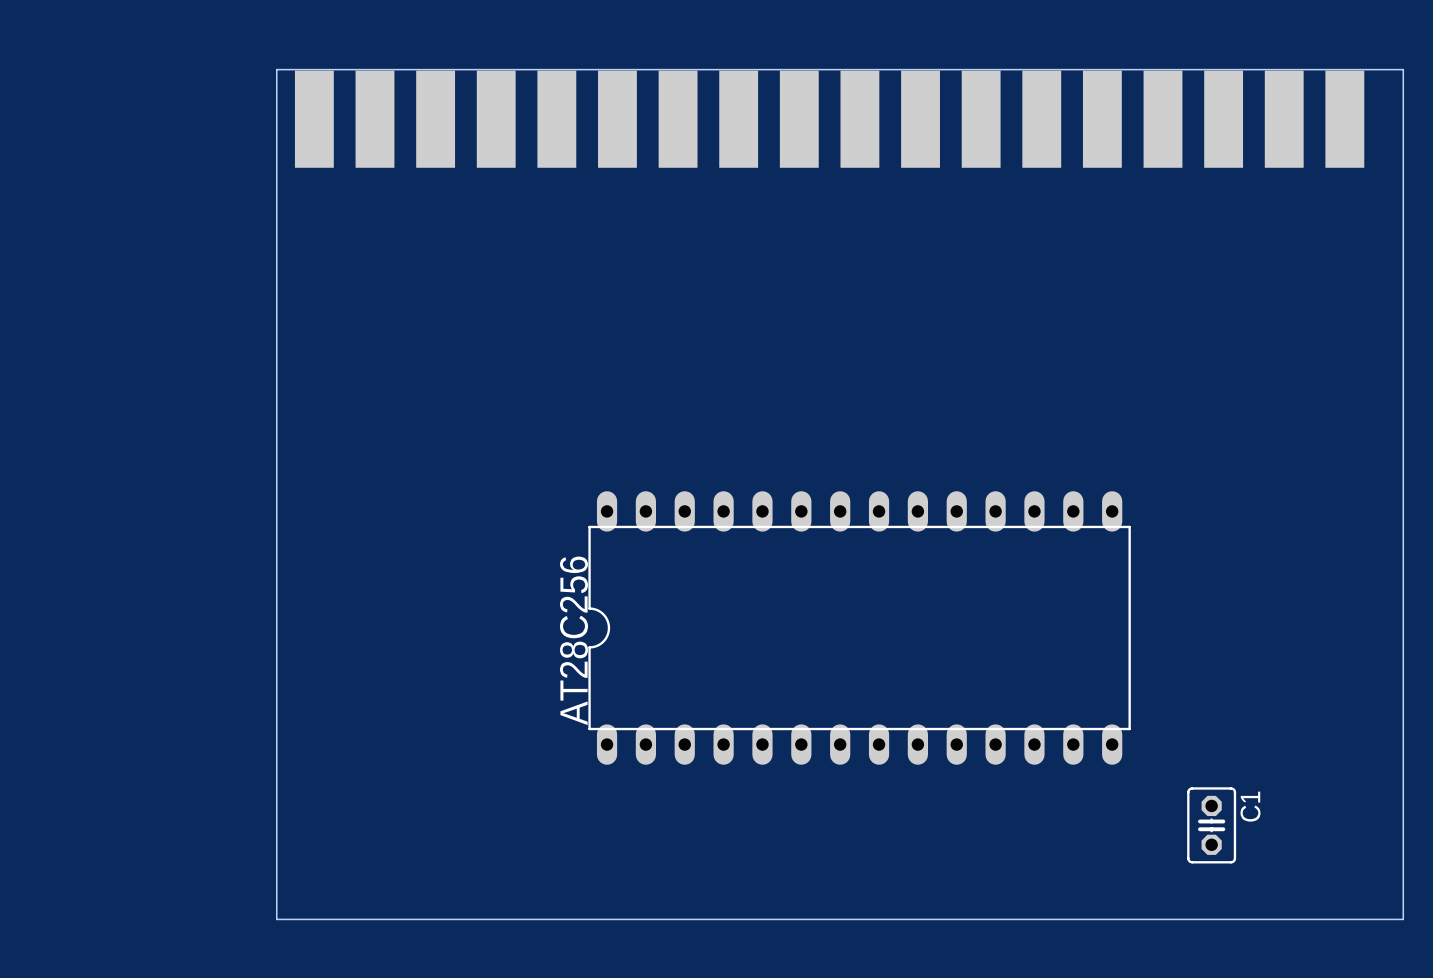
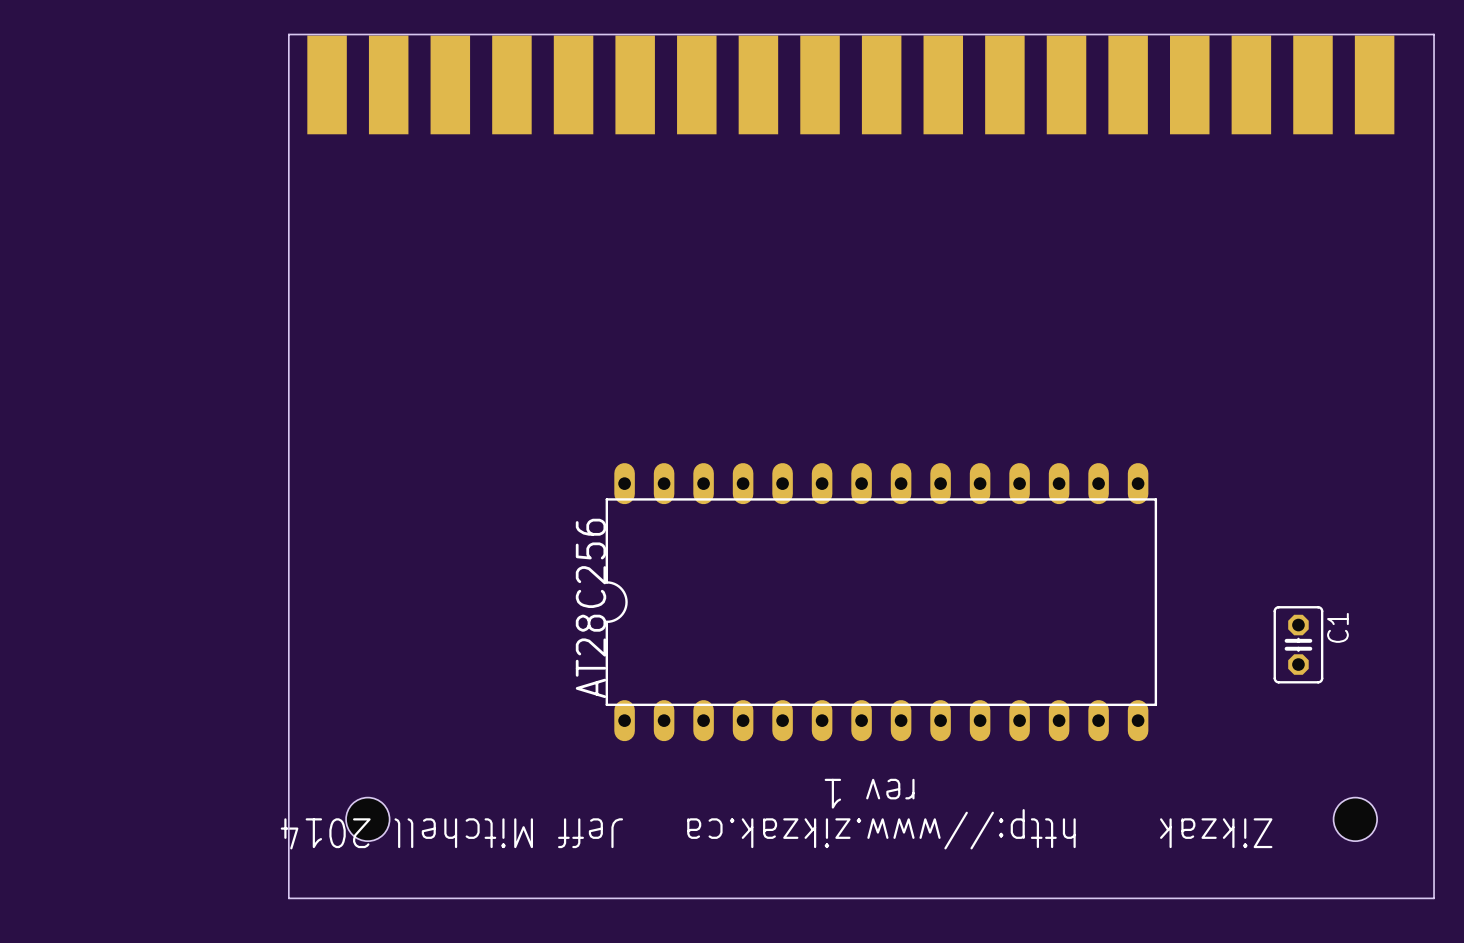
text: none -> rev 1 (869, 793)
C1 position: (1211, 825) -> (1298, 644)
hole: none -> (367, 819)
hole: none -> (1355, 819)
text: none -> Zikzak http://www.zikzak.ca Jeff Mitchell 2014 (776, 829)

